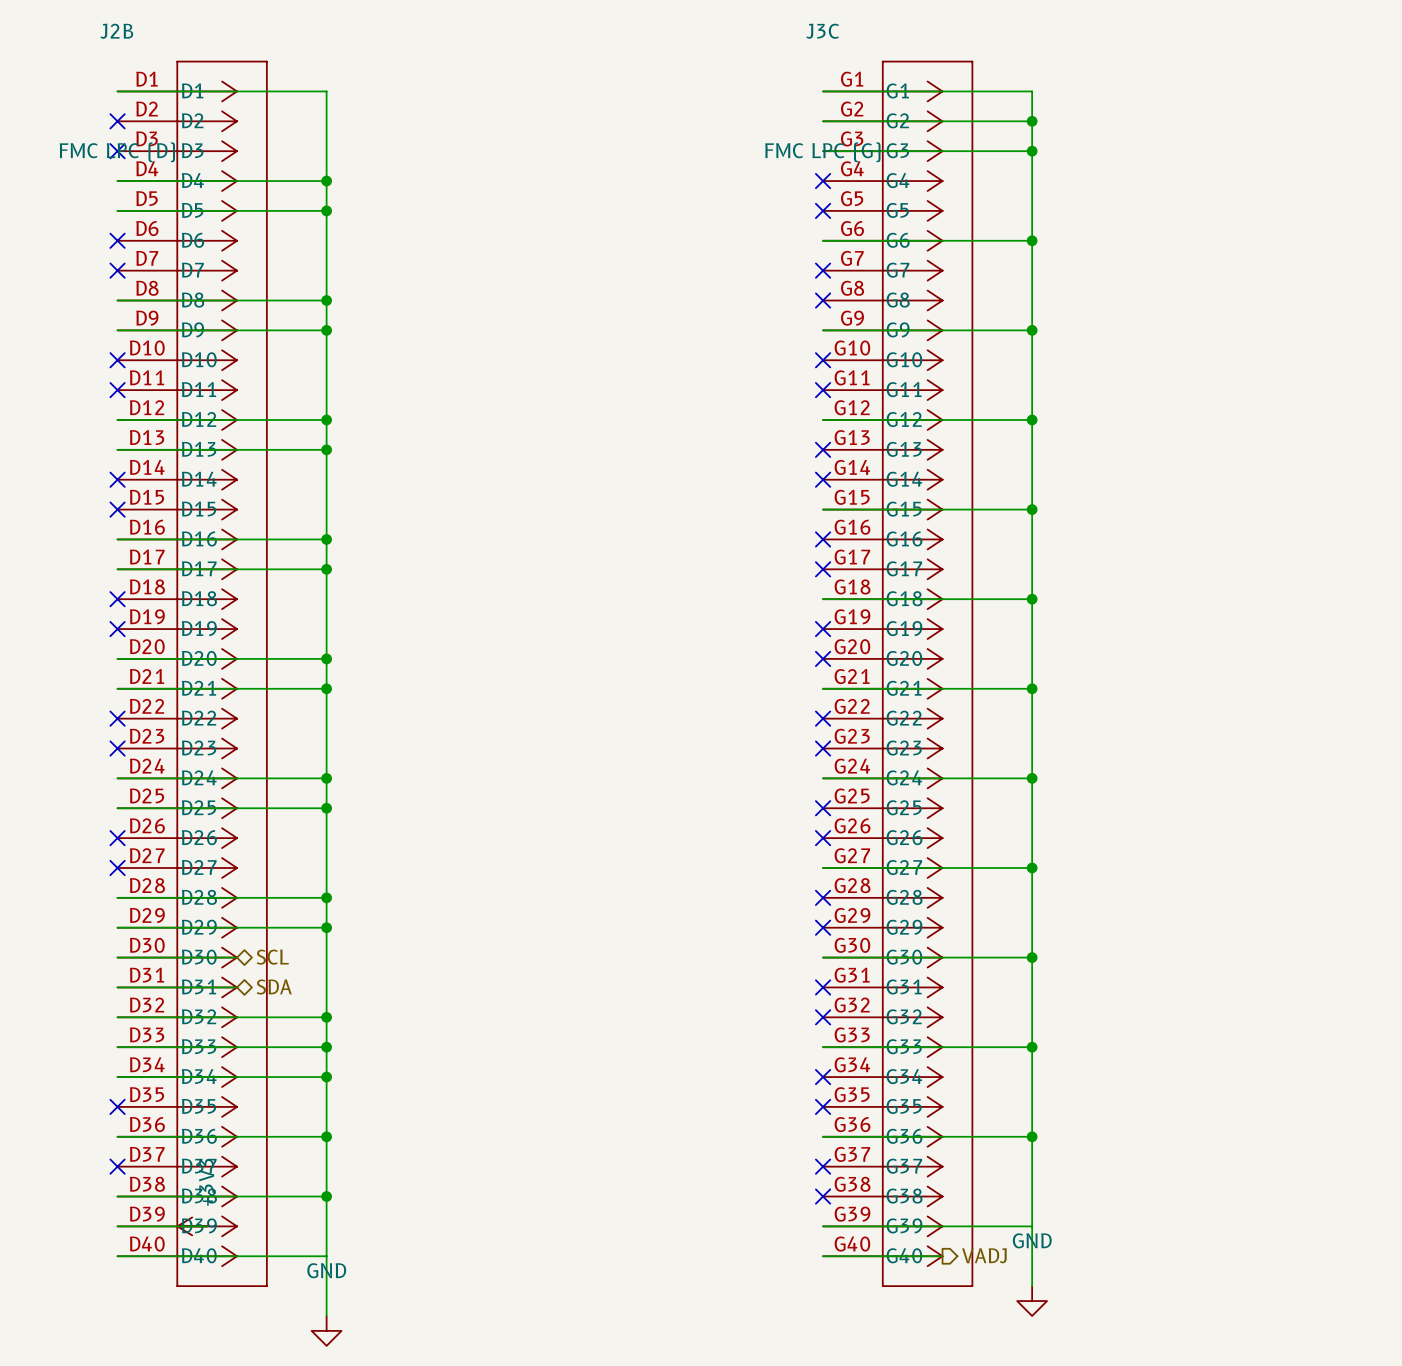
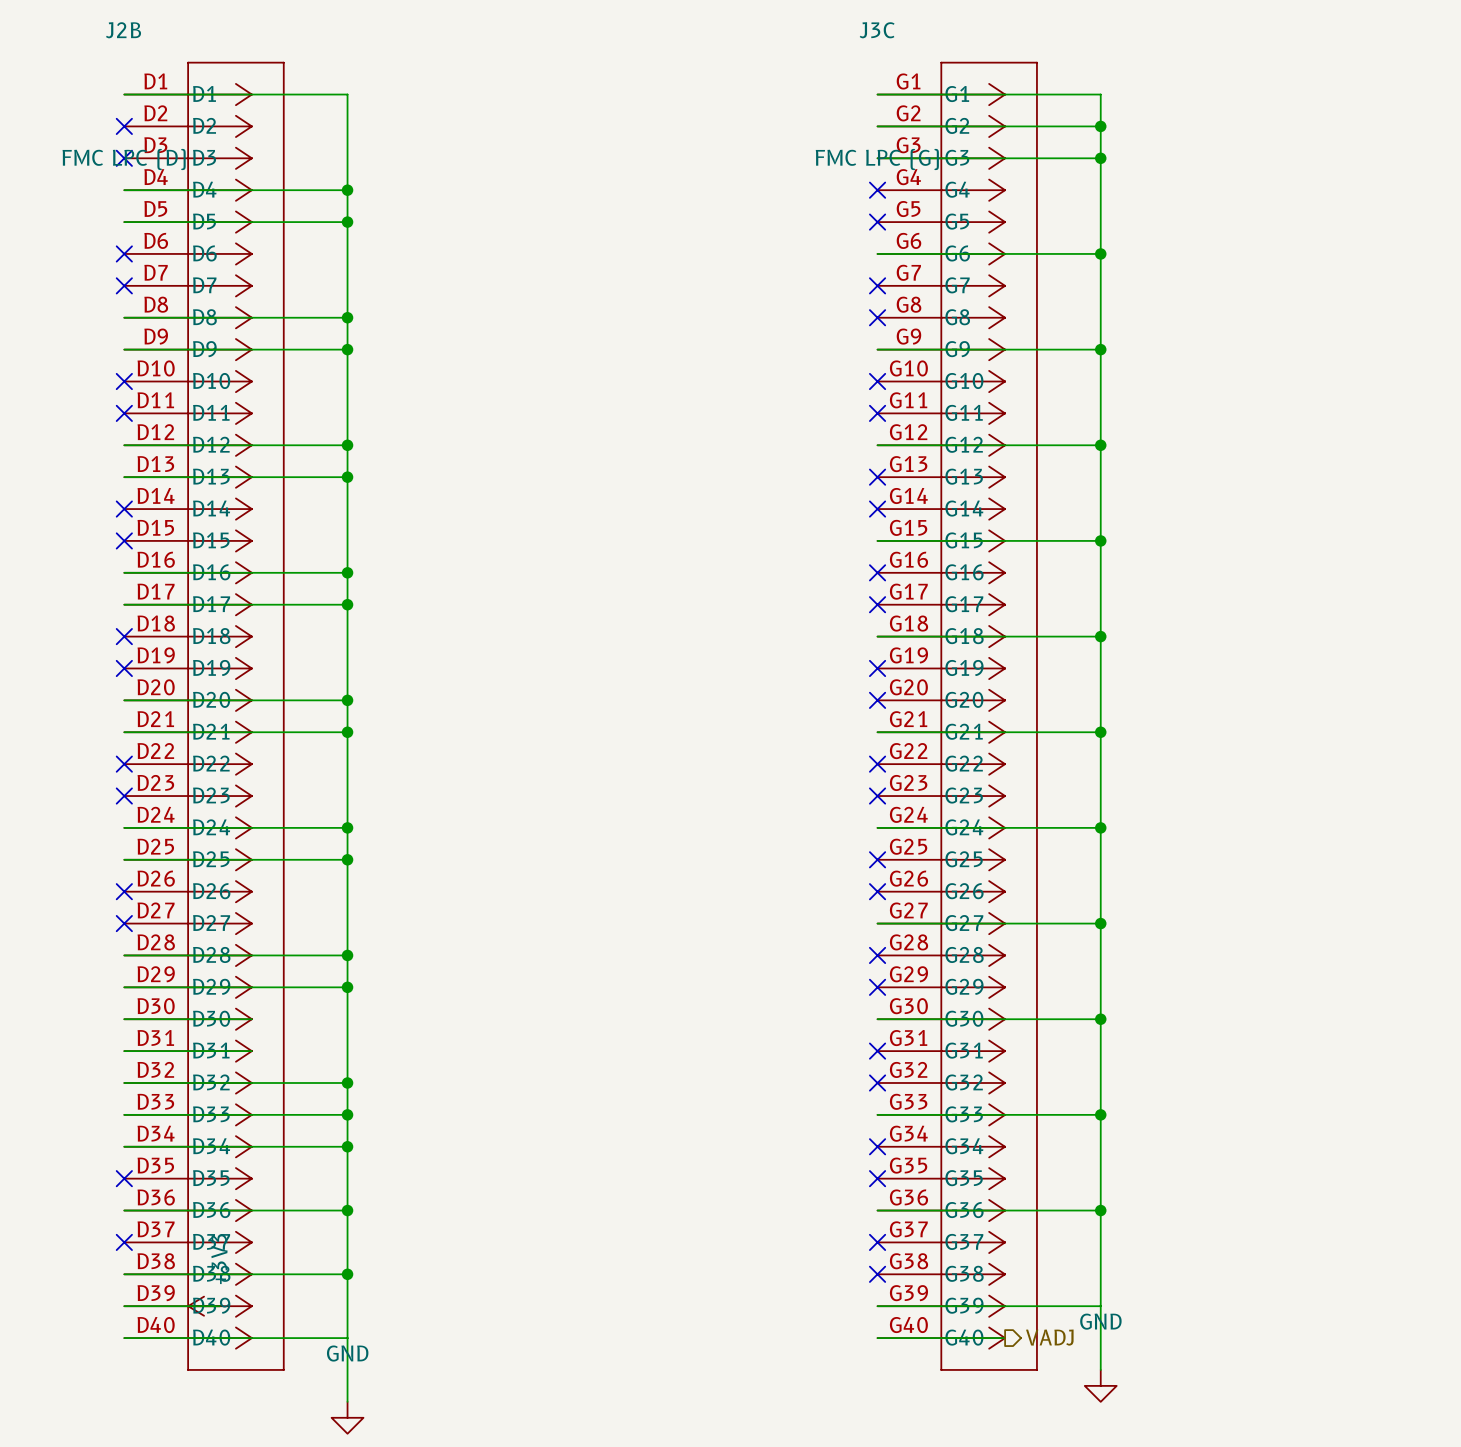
hierarchical label: SCL (272, 957) -> none
hierarchical label: SDA (274, 986) -> none

